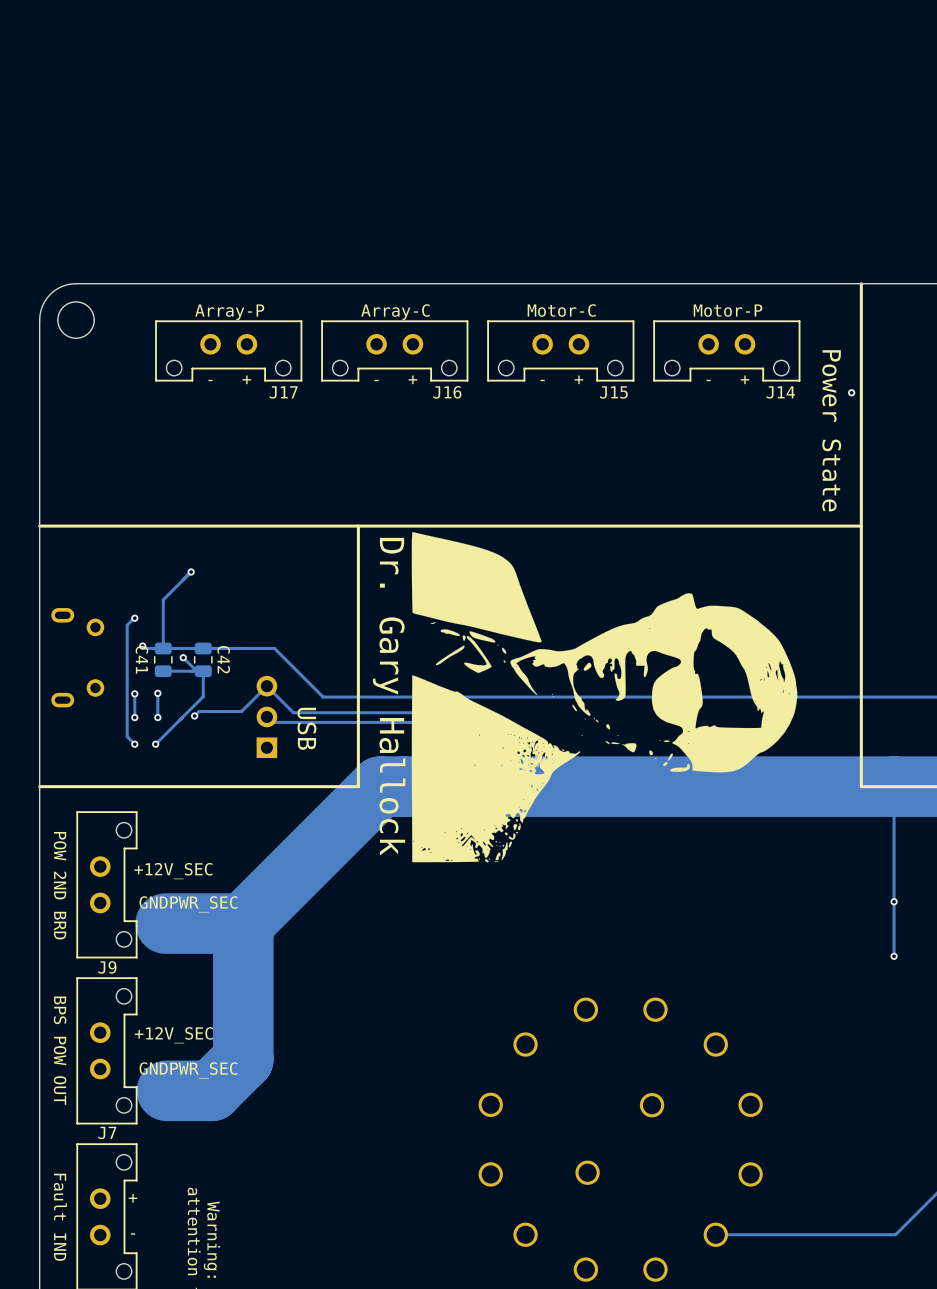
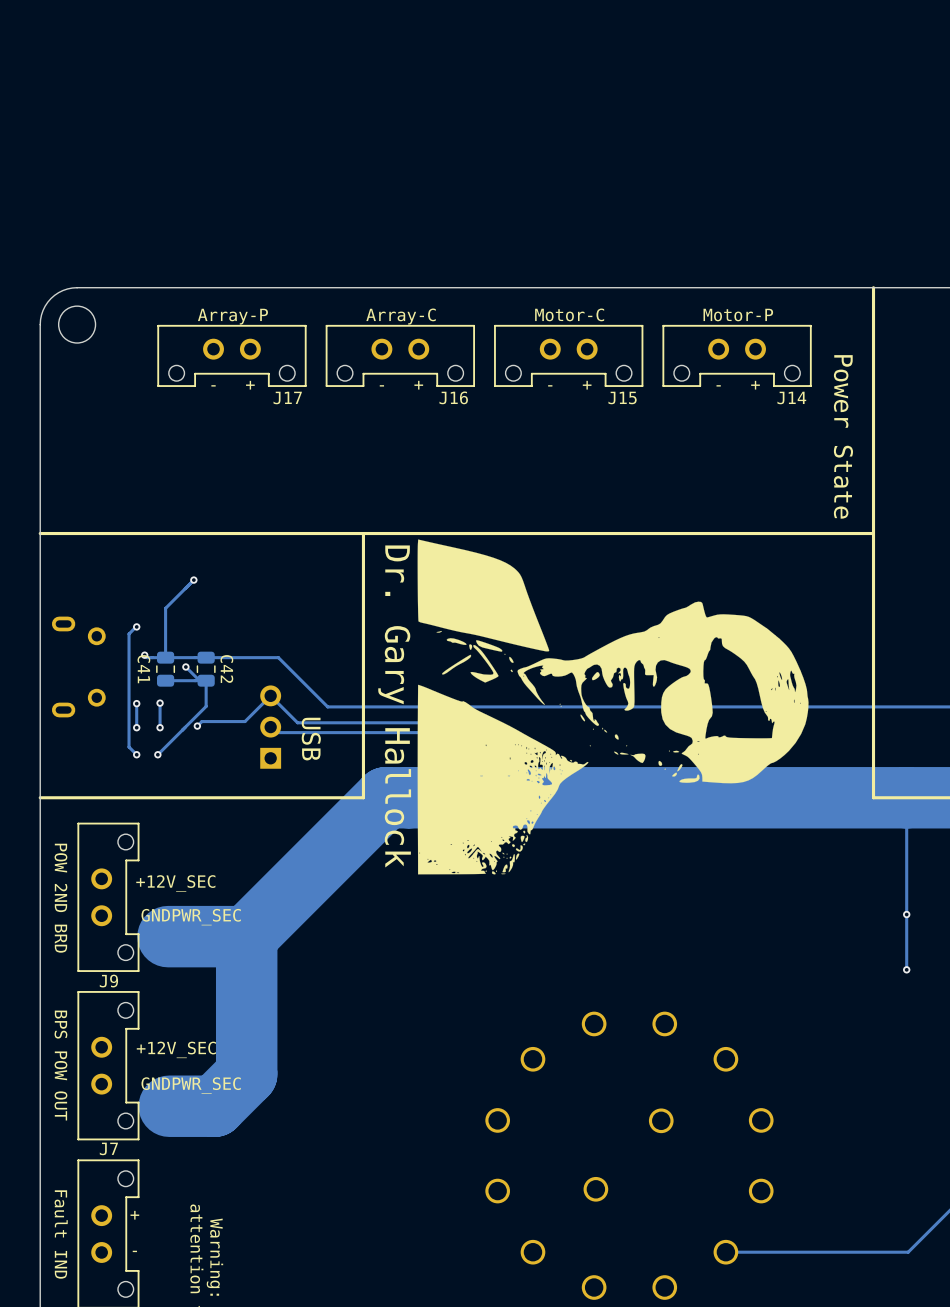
via: (851, 392) -> none

